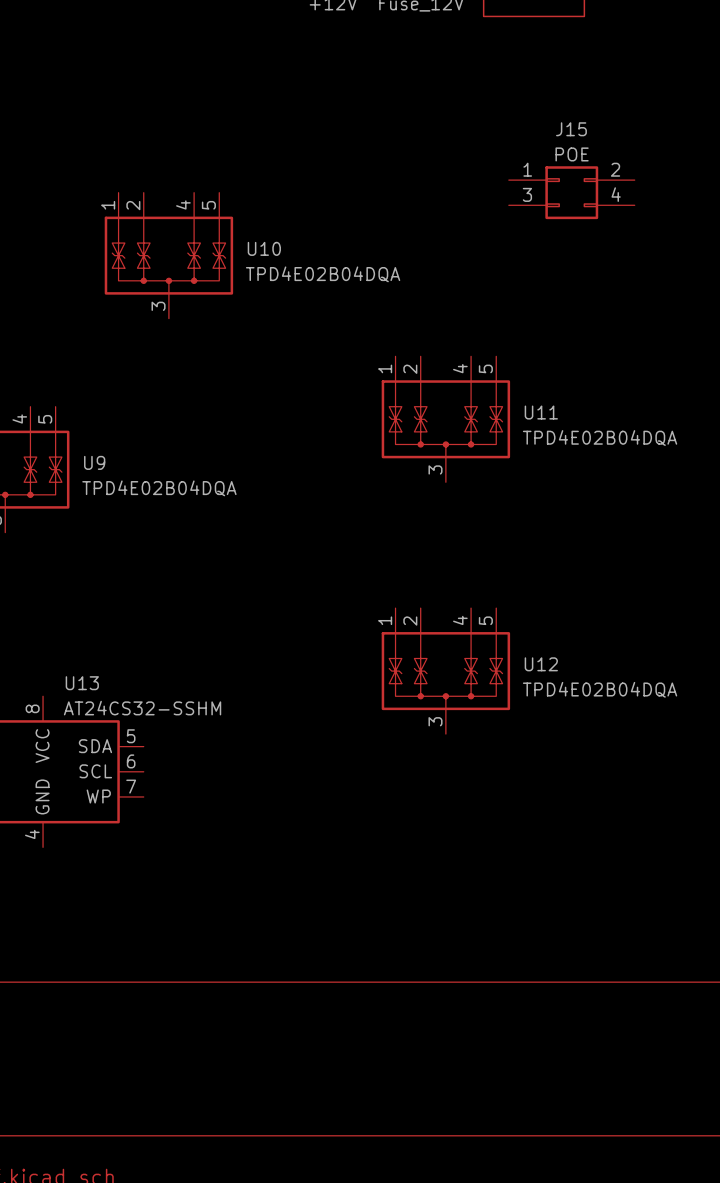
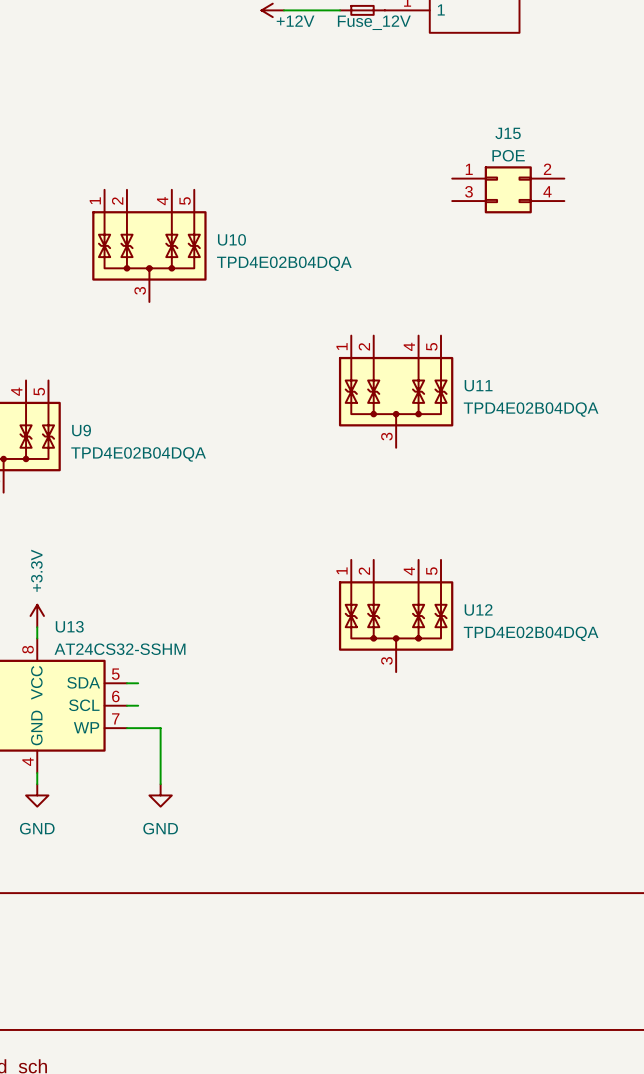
power symbol: none -> +3.3V (37, 615)
wire: none -> (37, 627) (37, 638)
wire: none -> (126, 683) (138, 683)
wire: none -> (126, 705) (138, 705)
wire: none -> (126, 728) (160, 728) (160, 784)
wire: none -> (37, 773) (37, 784)
power symbol: none -> GND (37, 795)
power symbol: none -> GND (160, 795)

